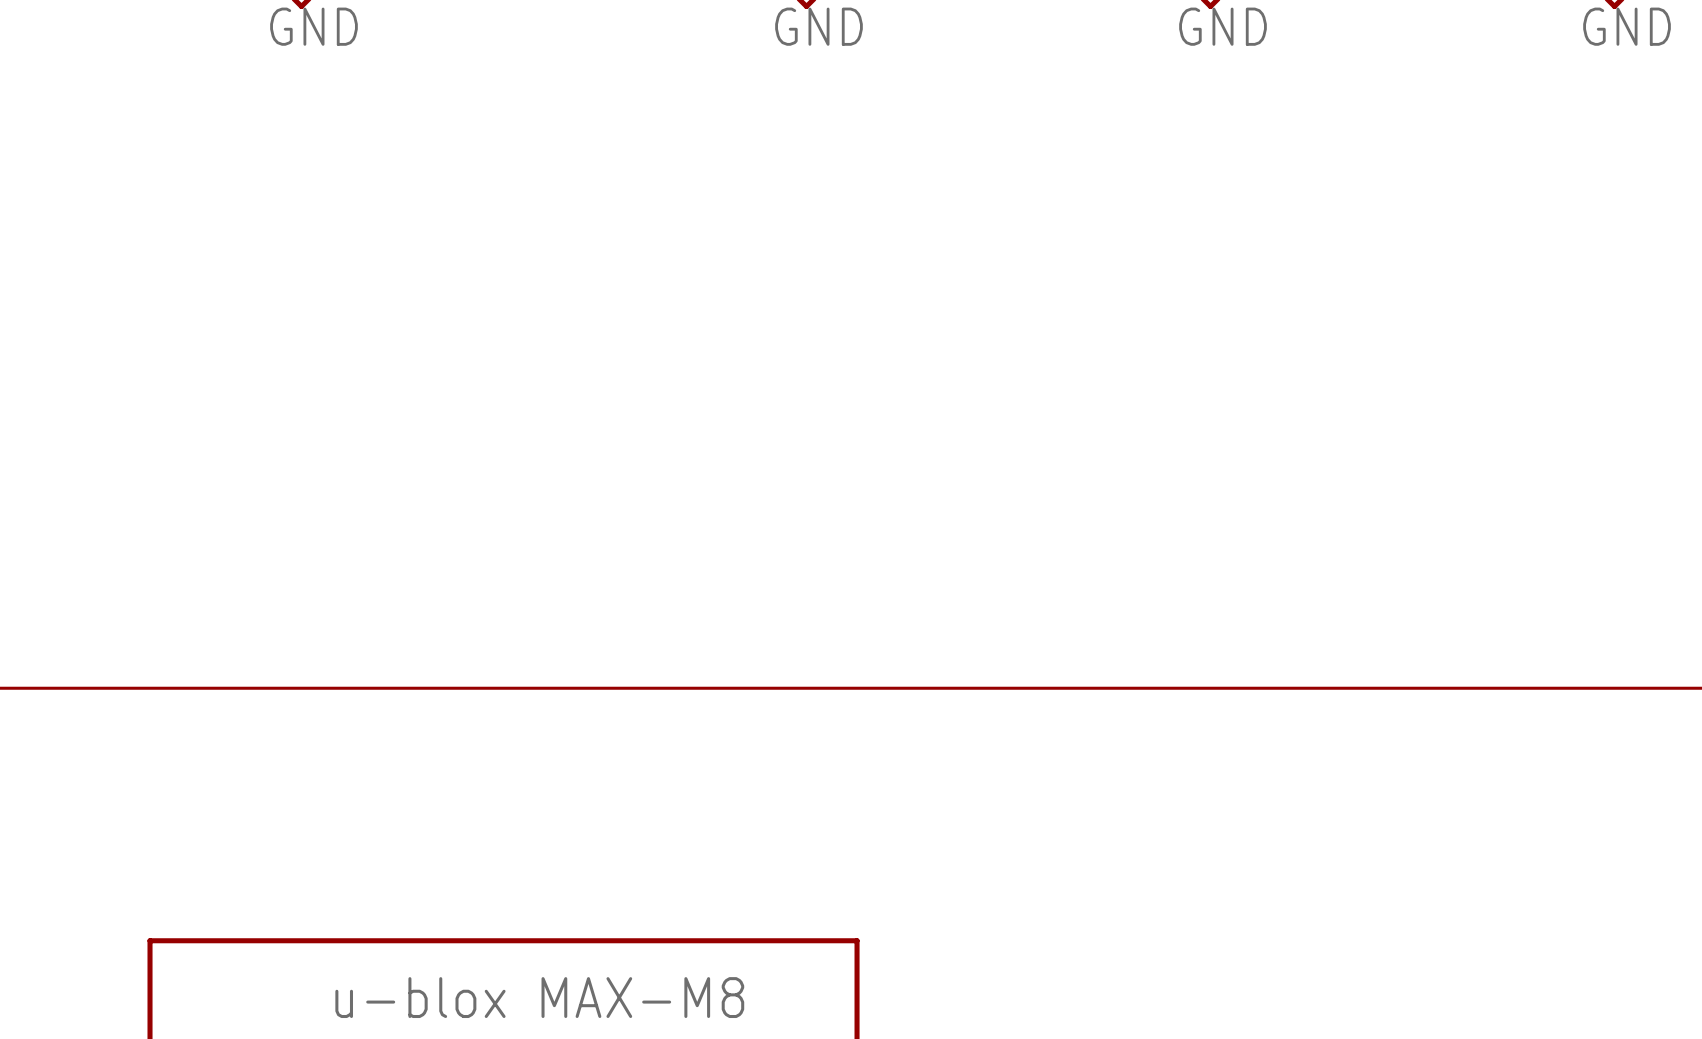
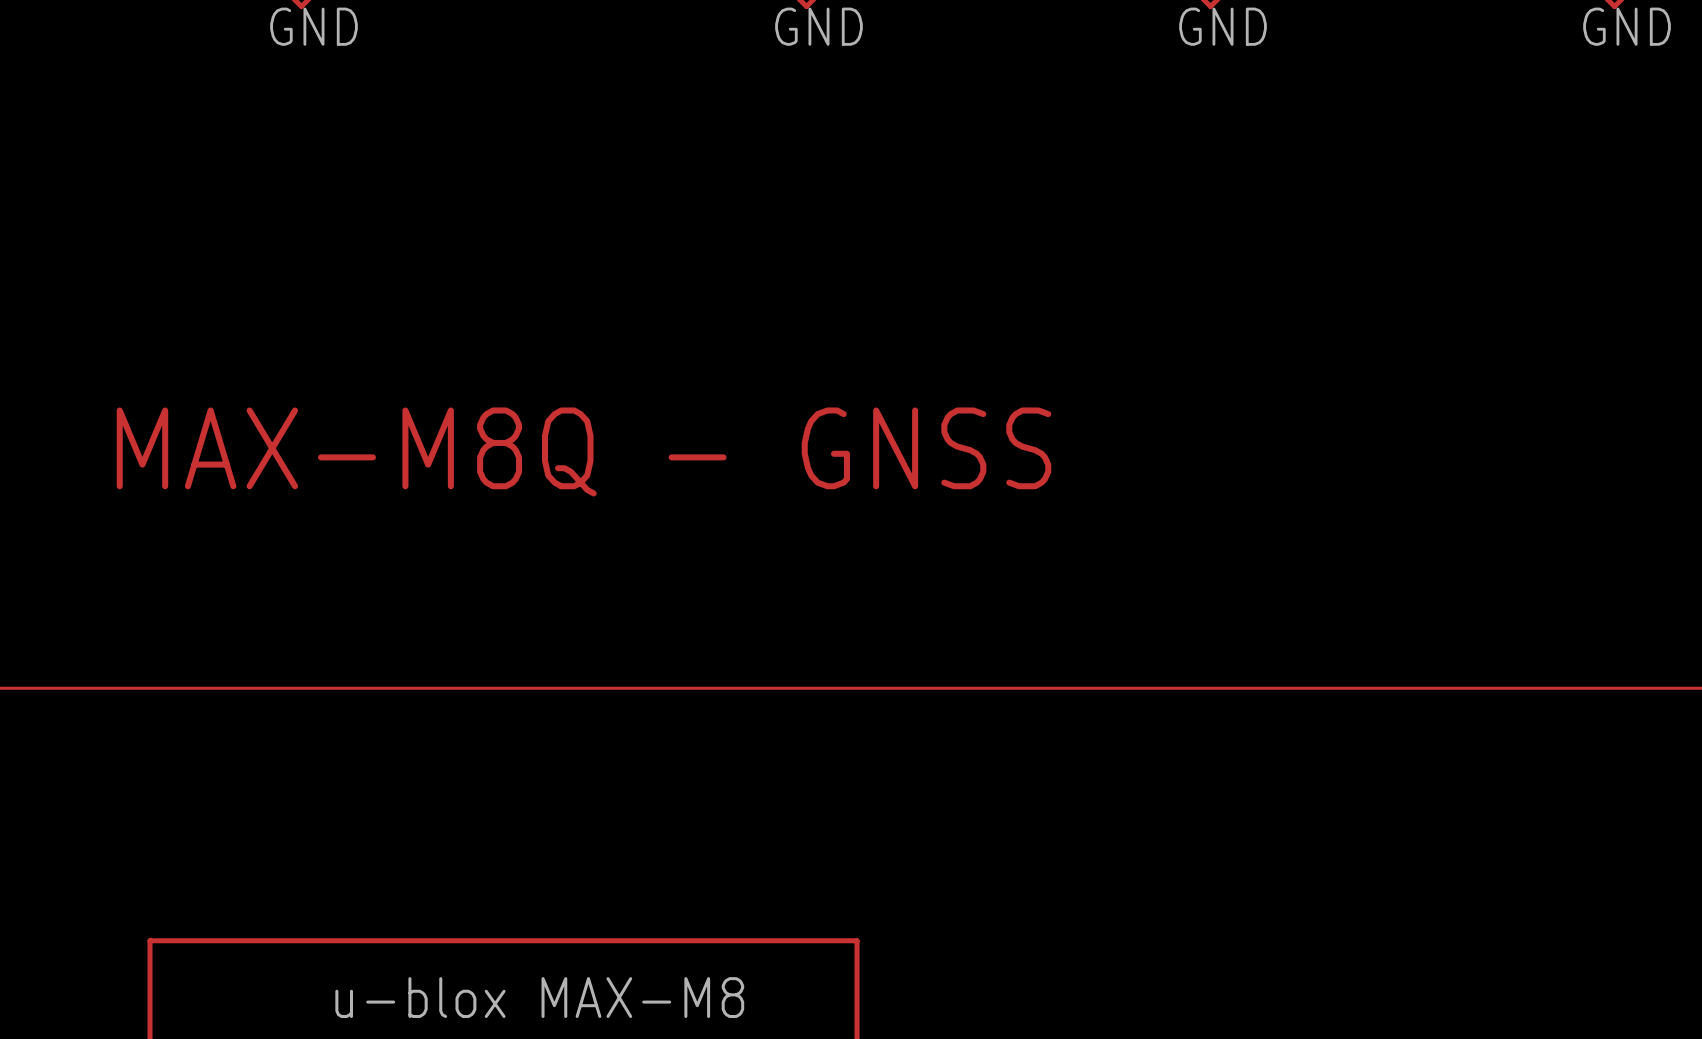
text: none -> MAX-M8Q - GNSS (583, 451)

